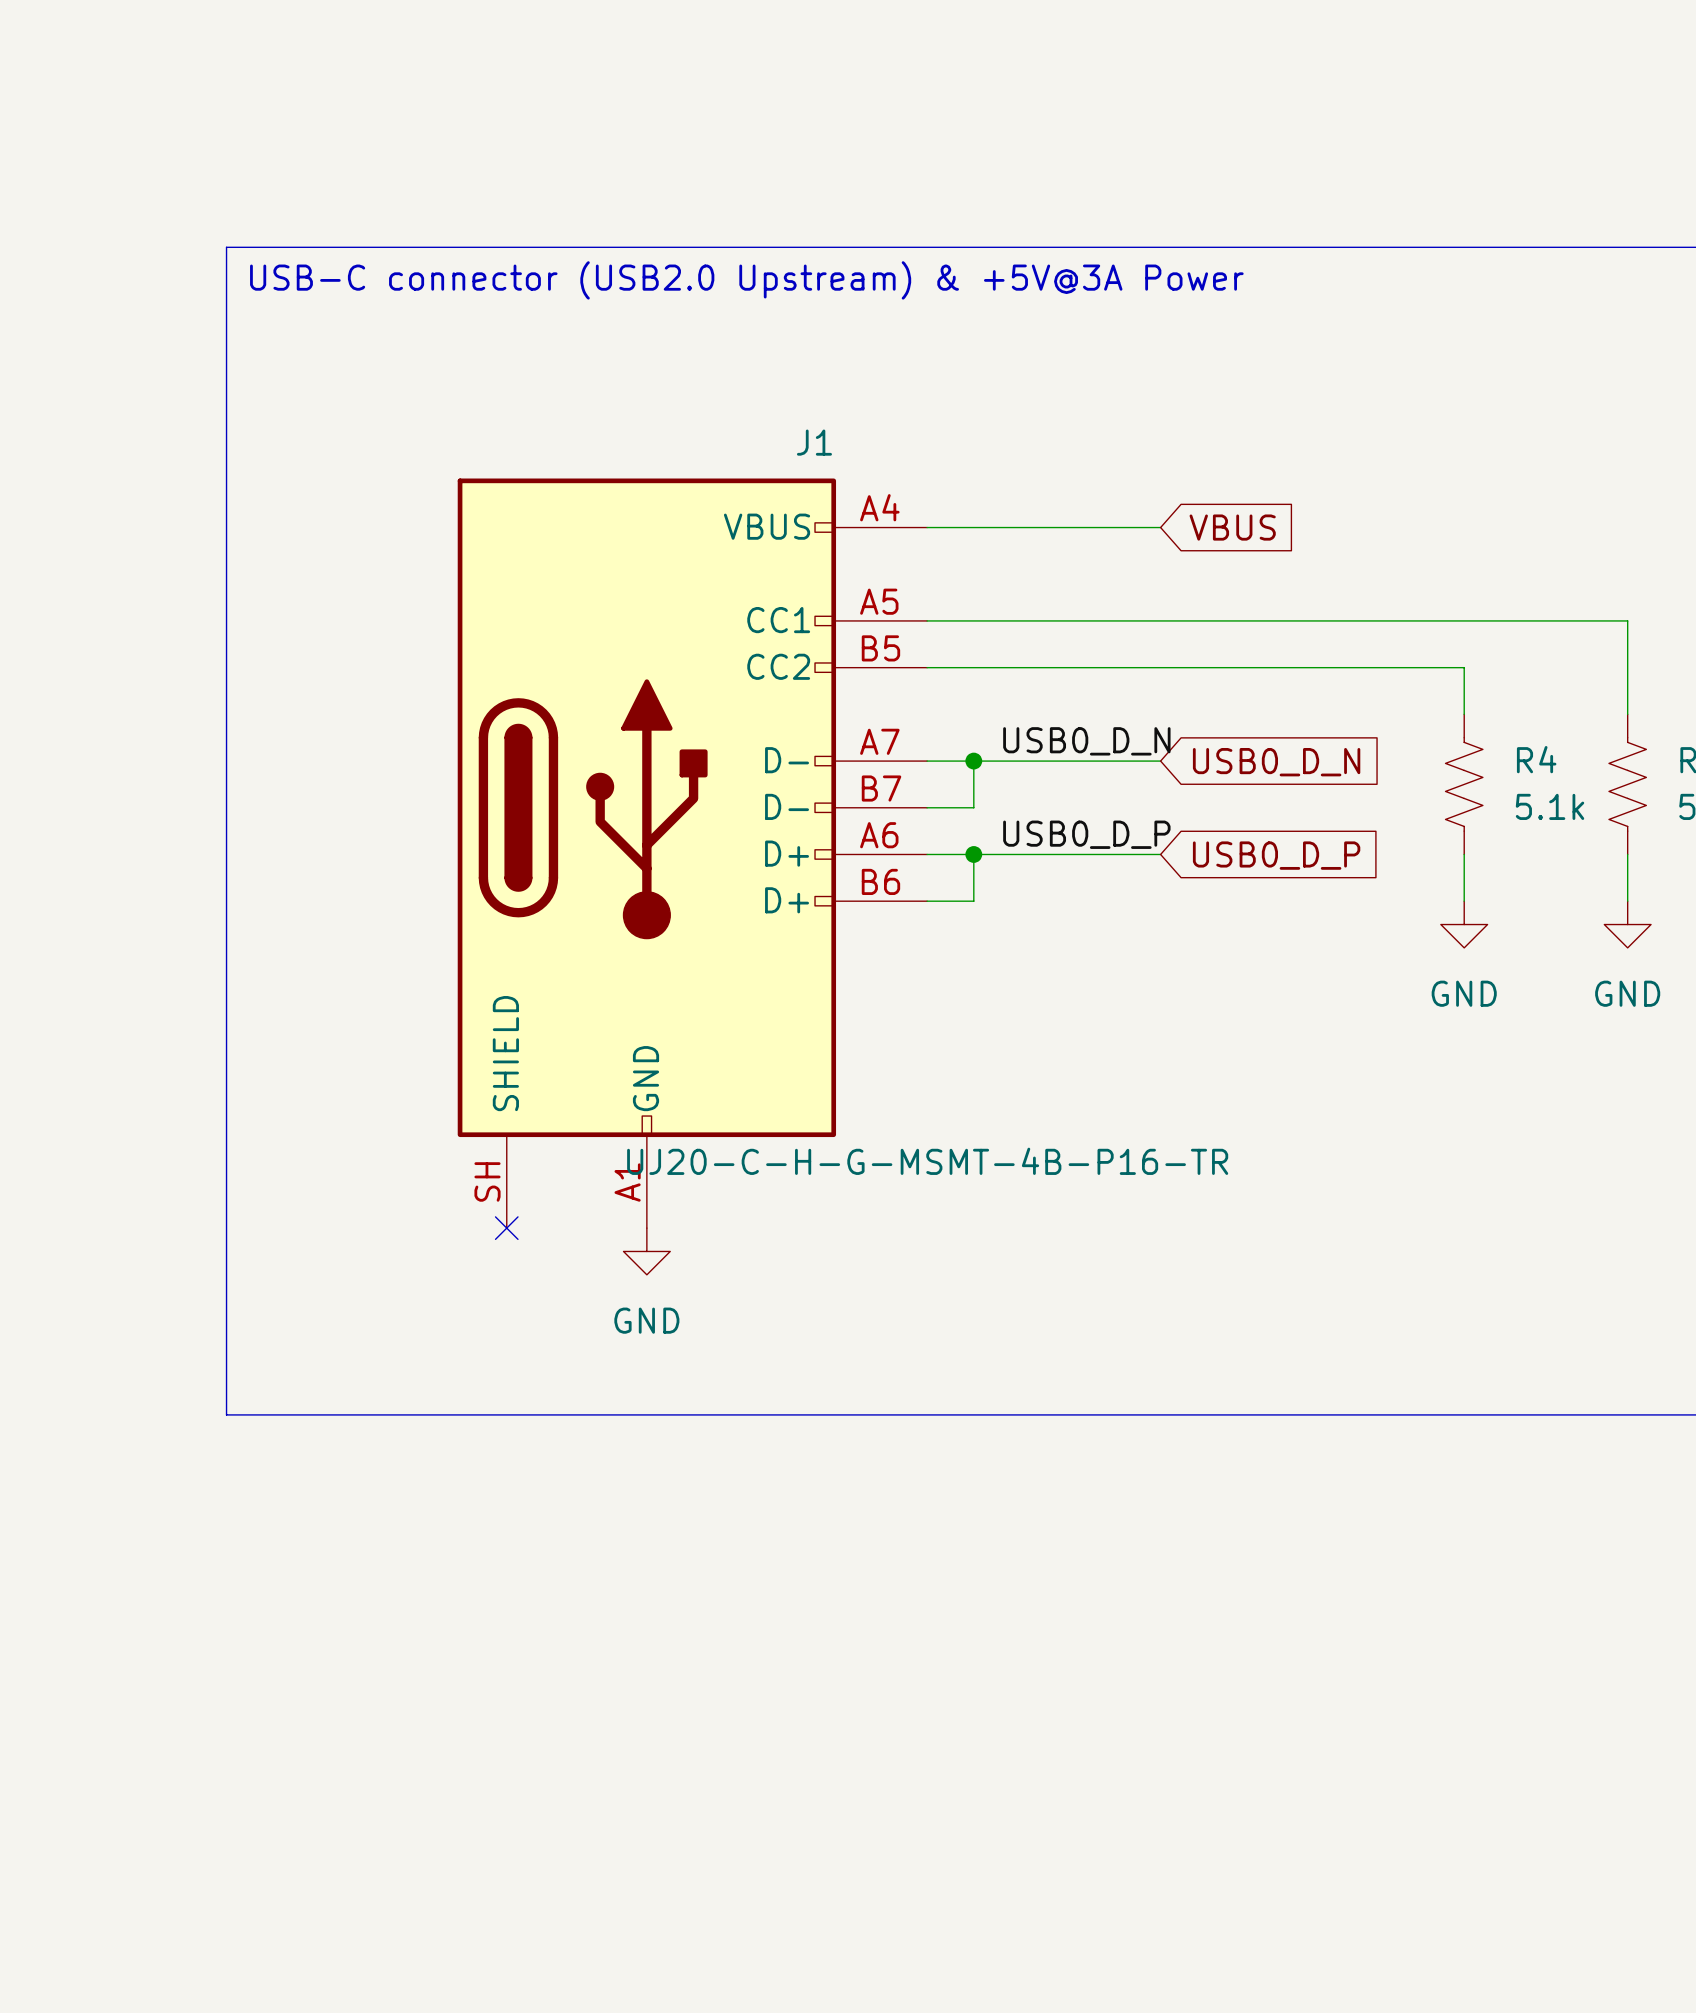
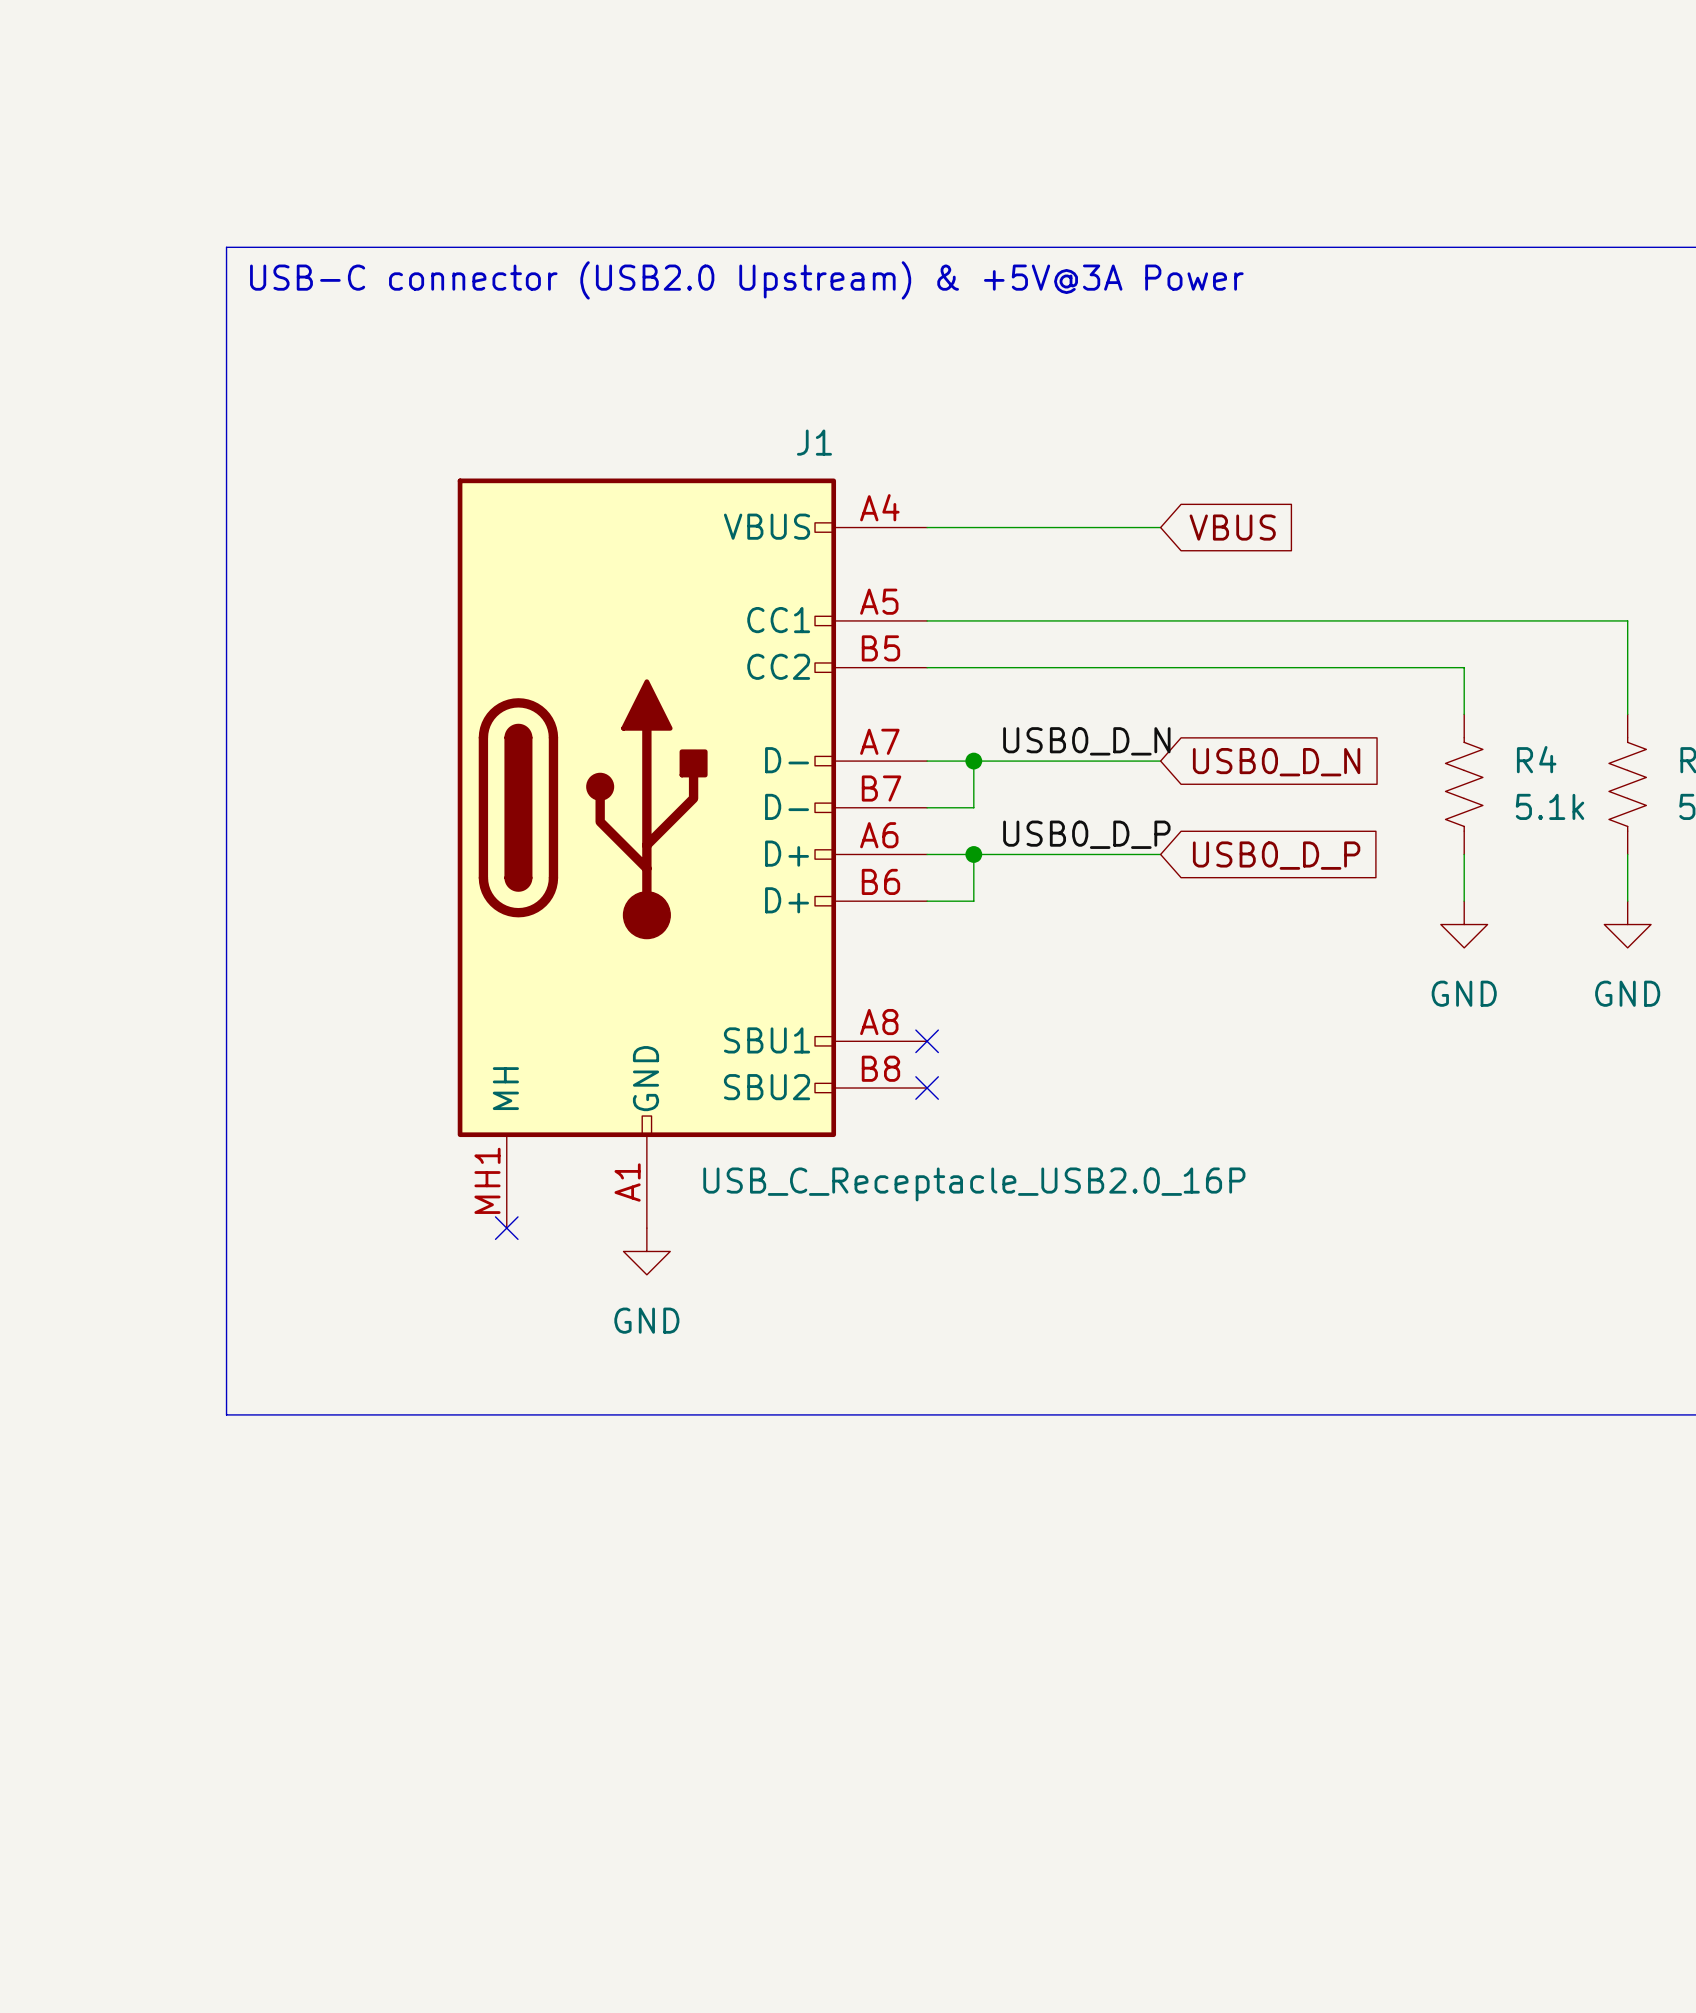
J1 symbol: [457, 478, 928, 1229] -> [457, 478, 928, 1229]
no-connect mark: none -> (927, 1041)
no-connect mark: none -> (927, 1088)
J1 value: UJ20-C-H-G-MSMT-4B-P16-TR (927, 1161) -> USB_C_Receptacle_USB2.0_16P (974, 1184)

